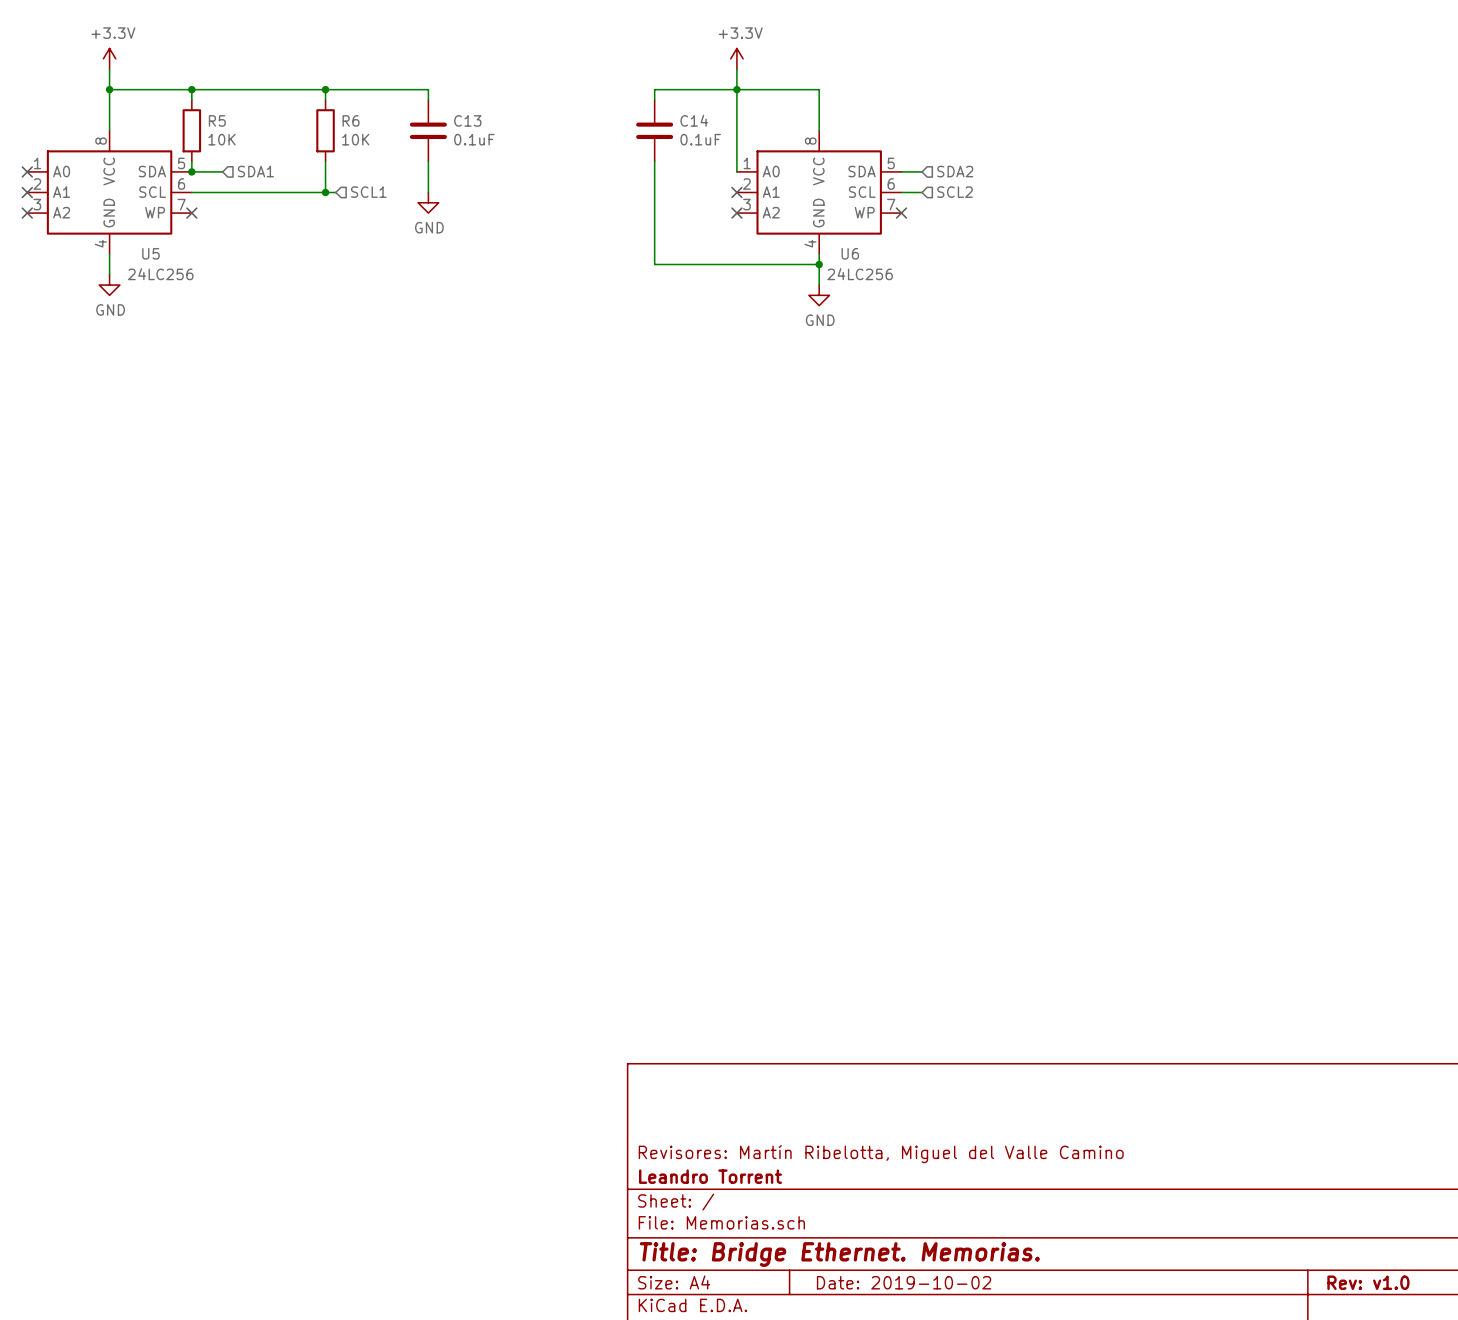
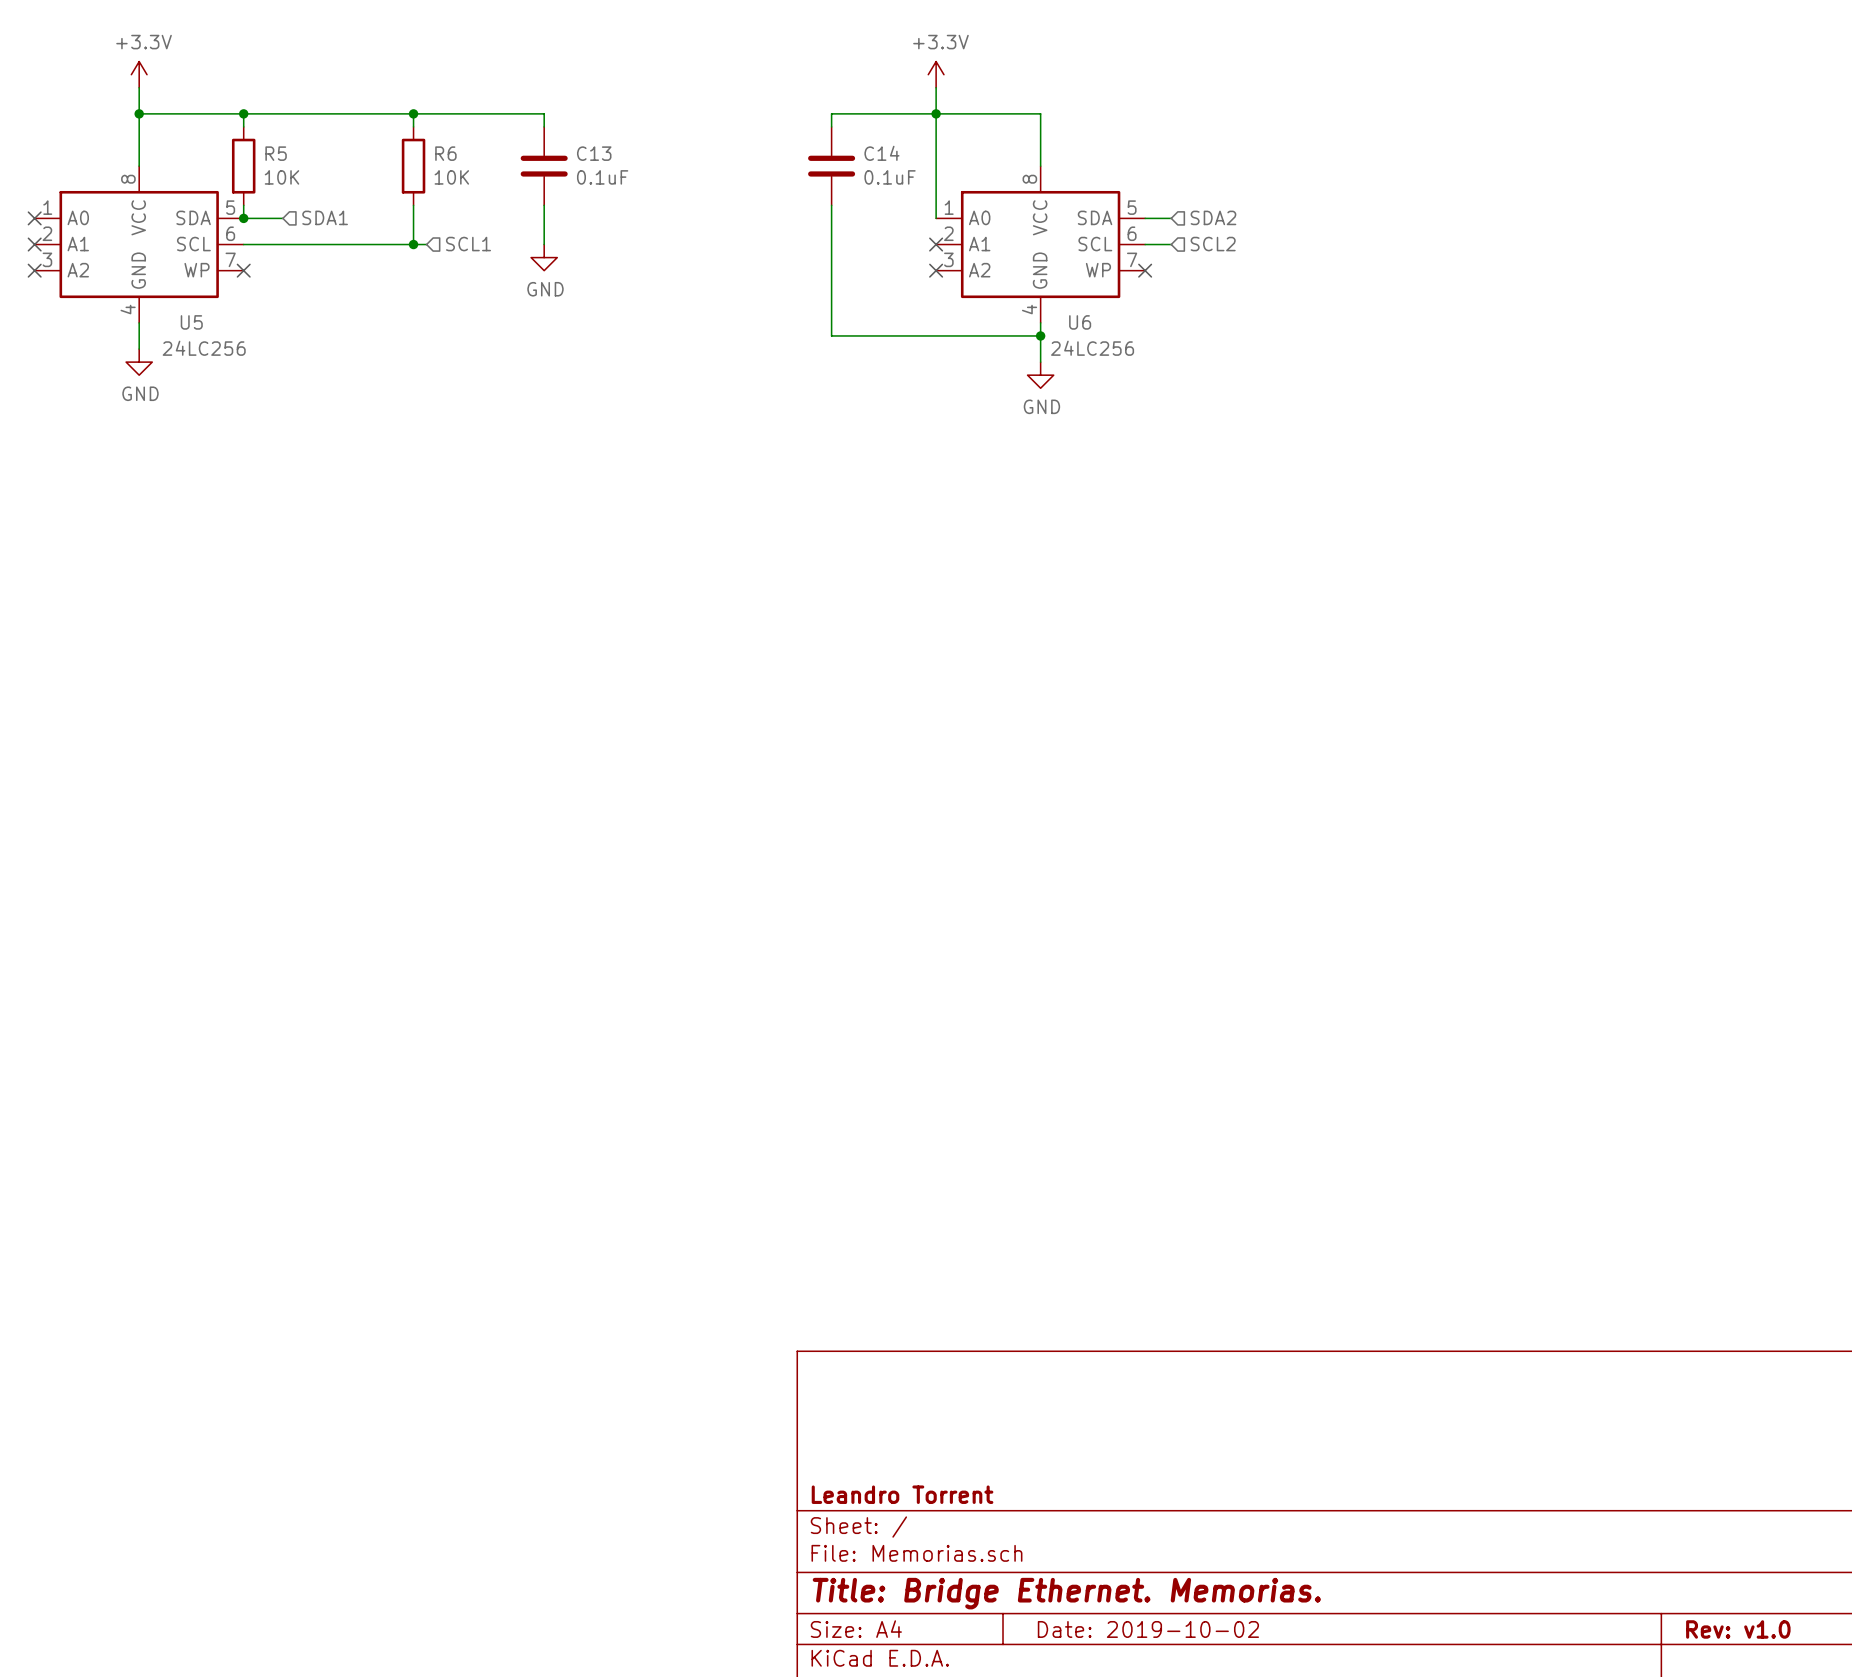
title block: Revisores: Martín Ribelotta, Miguel del Valle Camino (881, 1154) -> none

